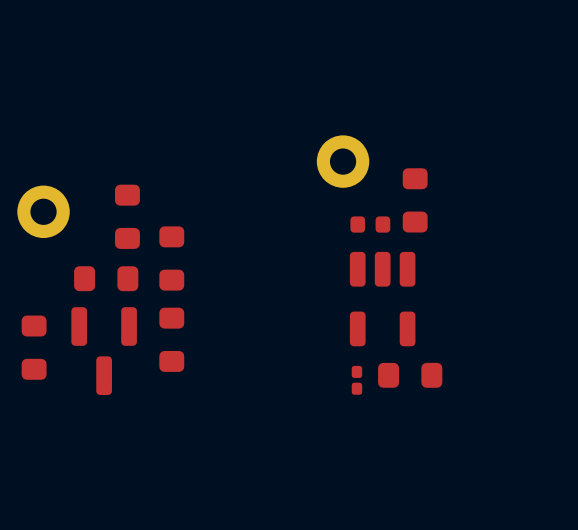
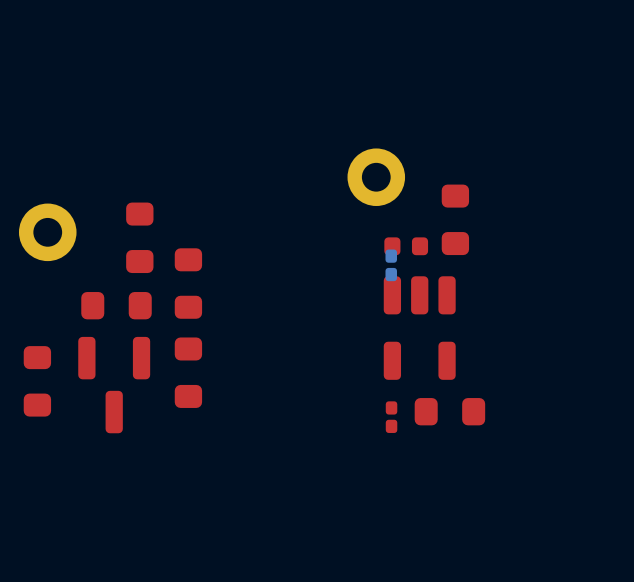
part: none -> (391, 265)

